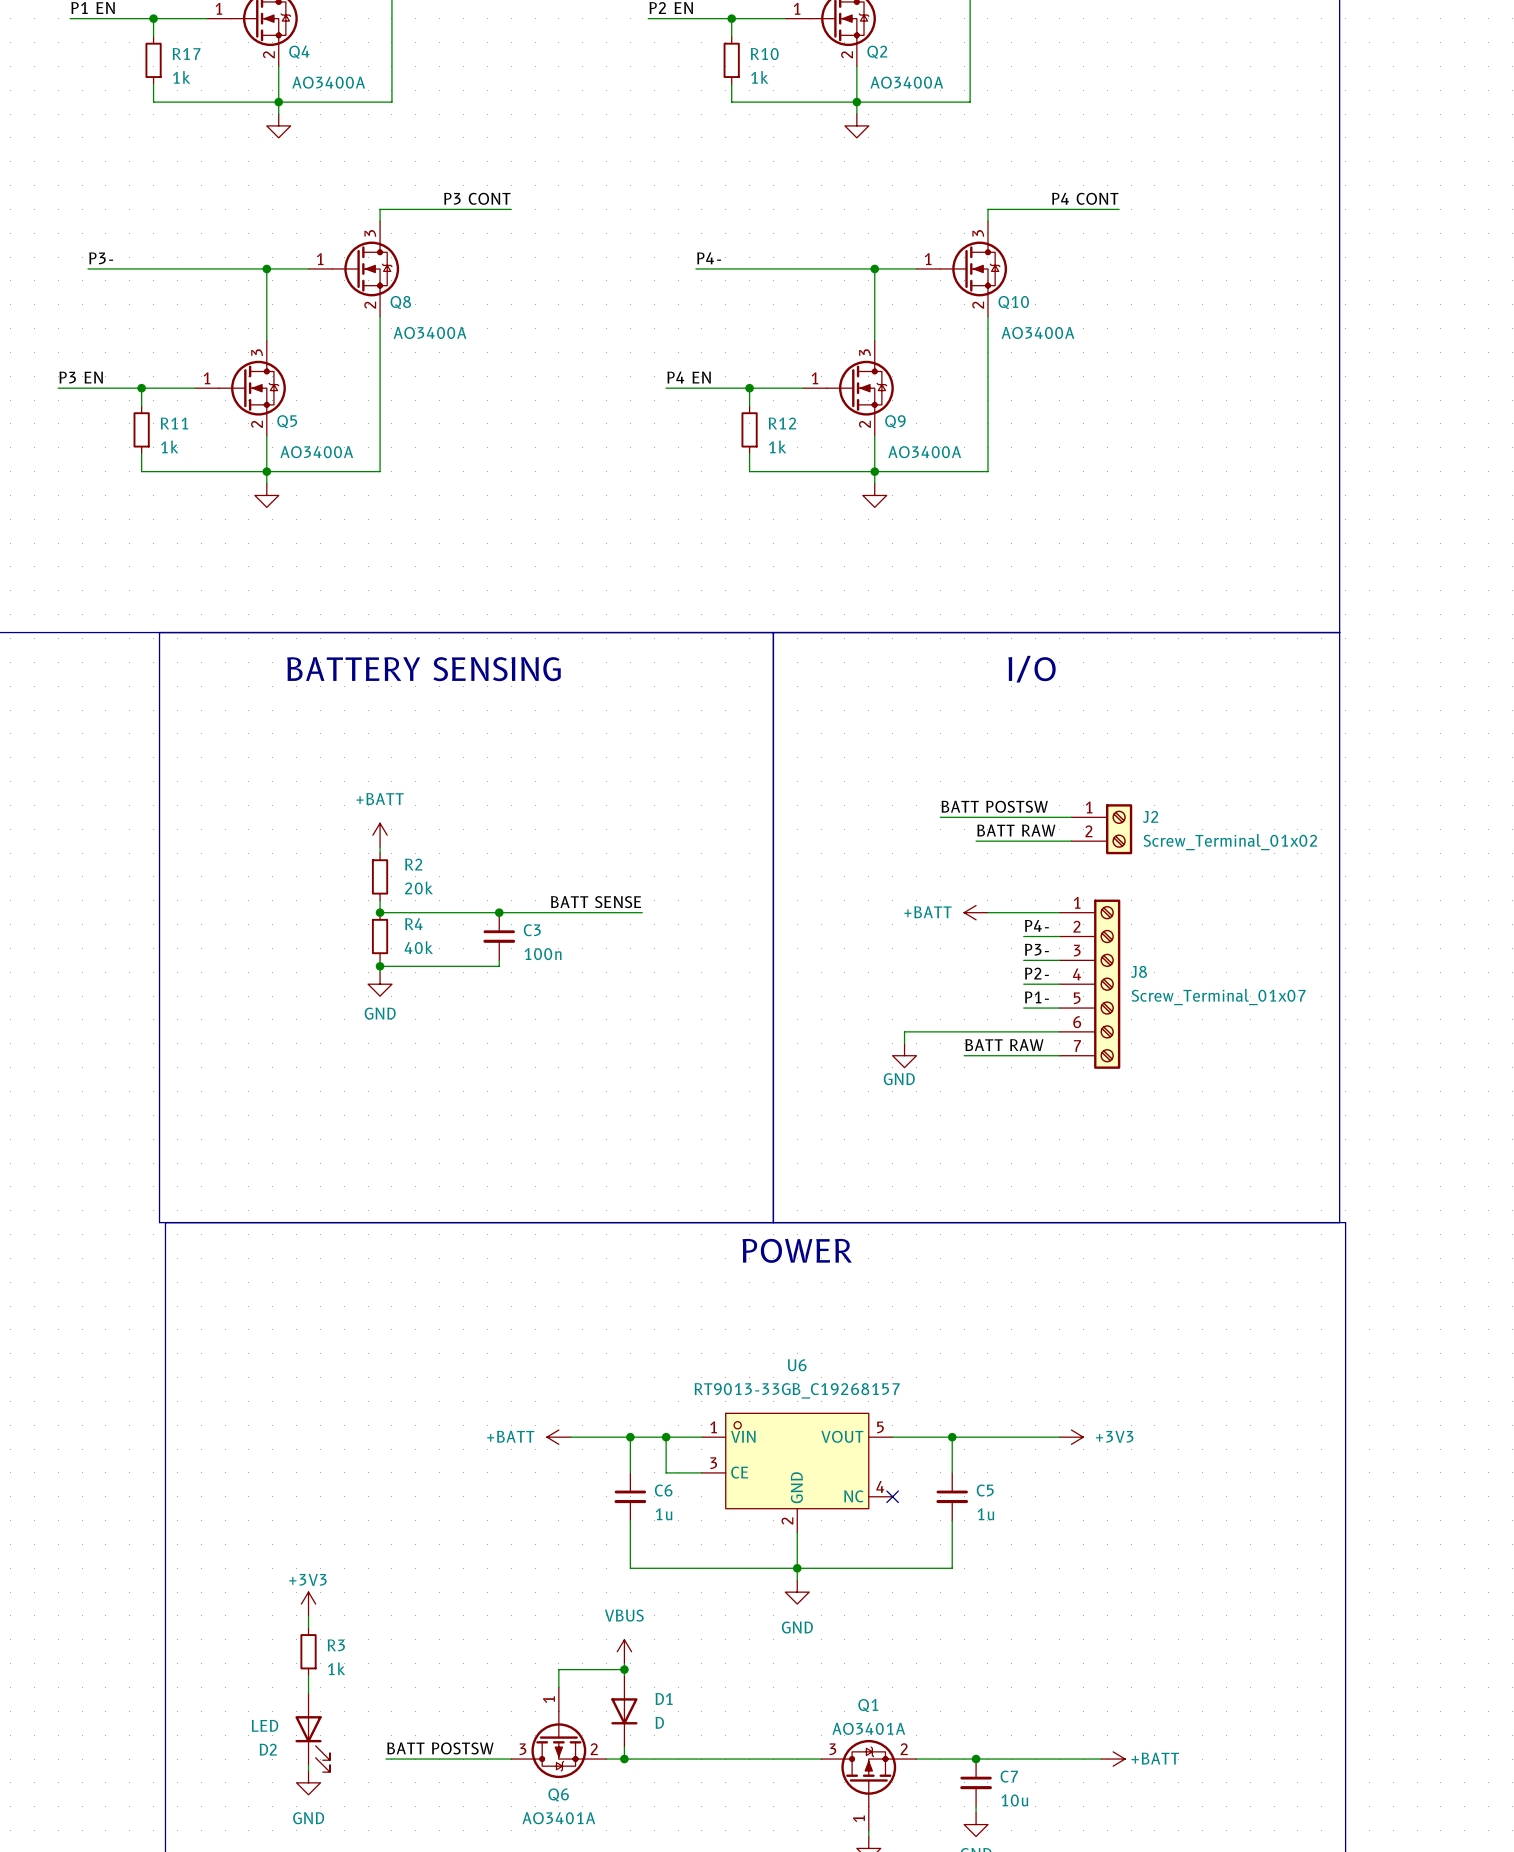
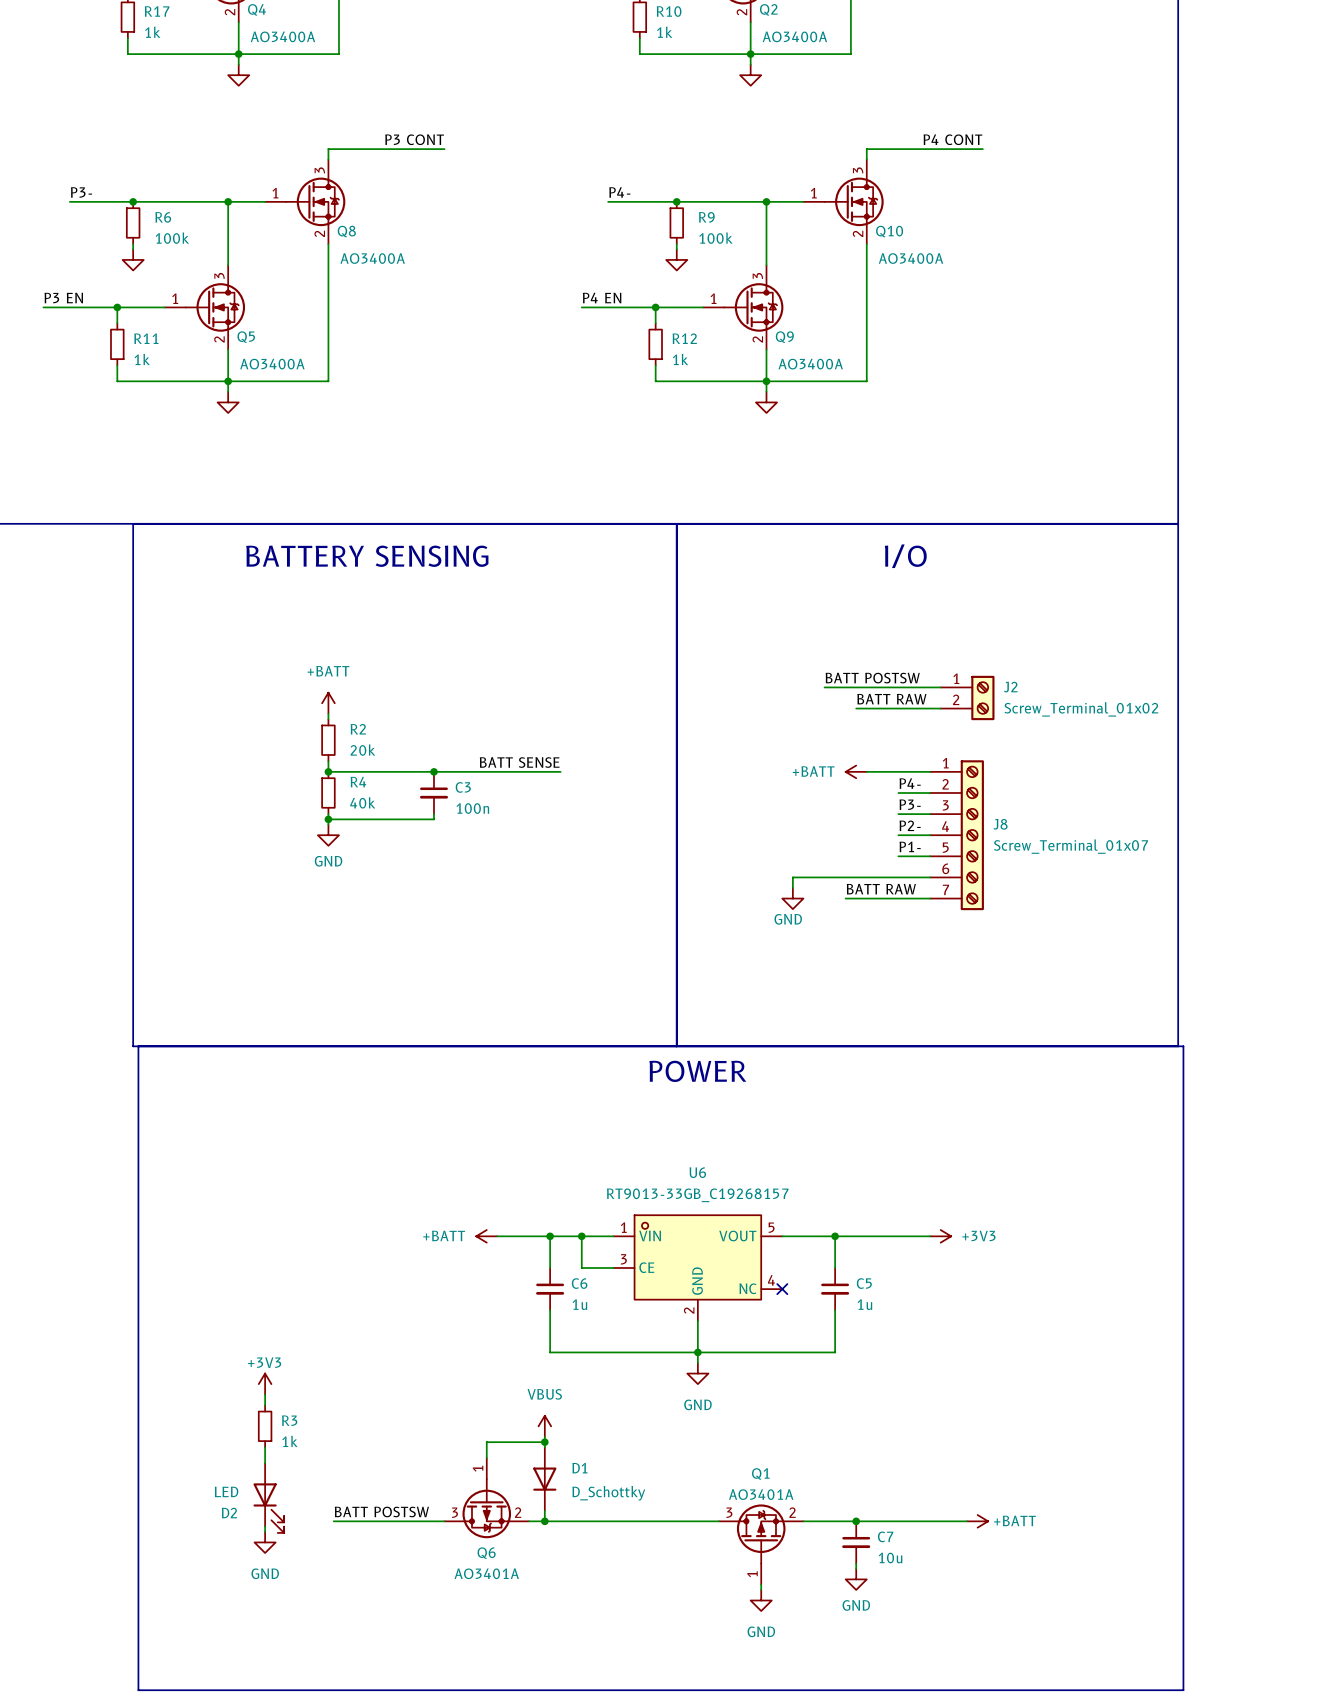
junction: none -> (133, 201)
junction: none -> (676, 201)
R6: none -> 100k (133, 222)
R9: none -> 100k (676, 222)
wire: none -> (133, 244) (133, 249)
wire: none -> (676, 244) (676, 249)
power symbol: none -> (133, 259)
power symbol: none -> (676, 259)
D1 value: D (659, 1722) -> D_Schottky (608, 1493)

